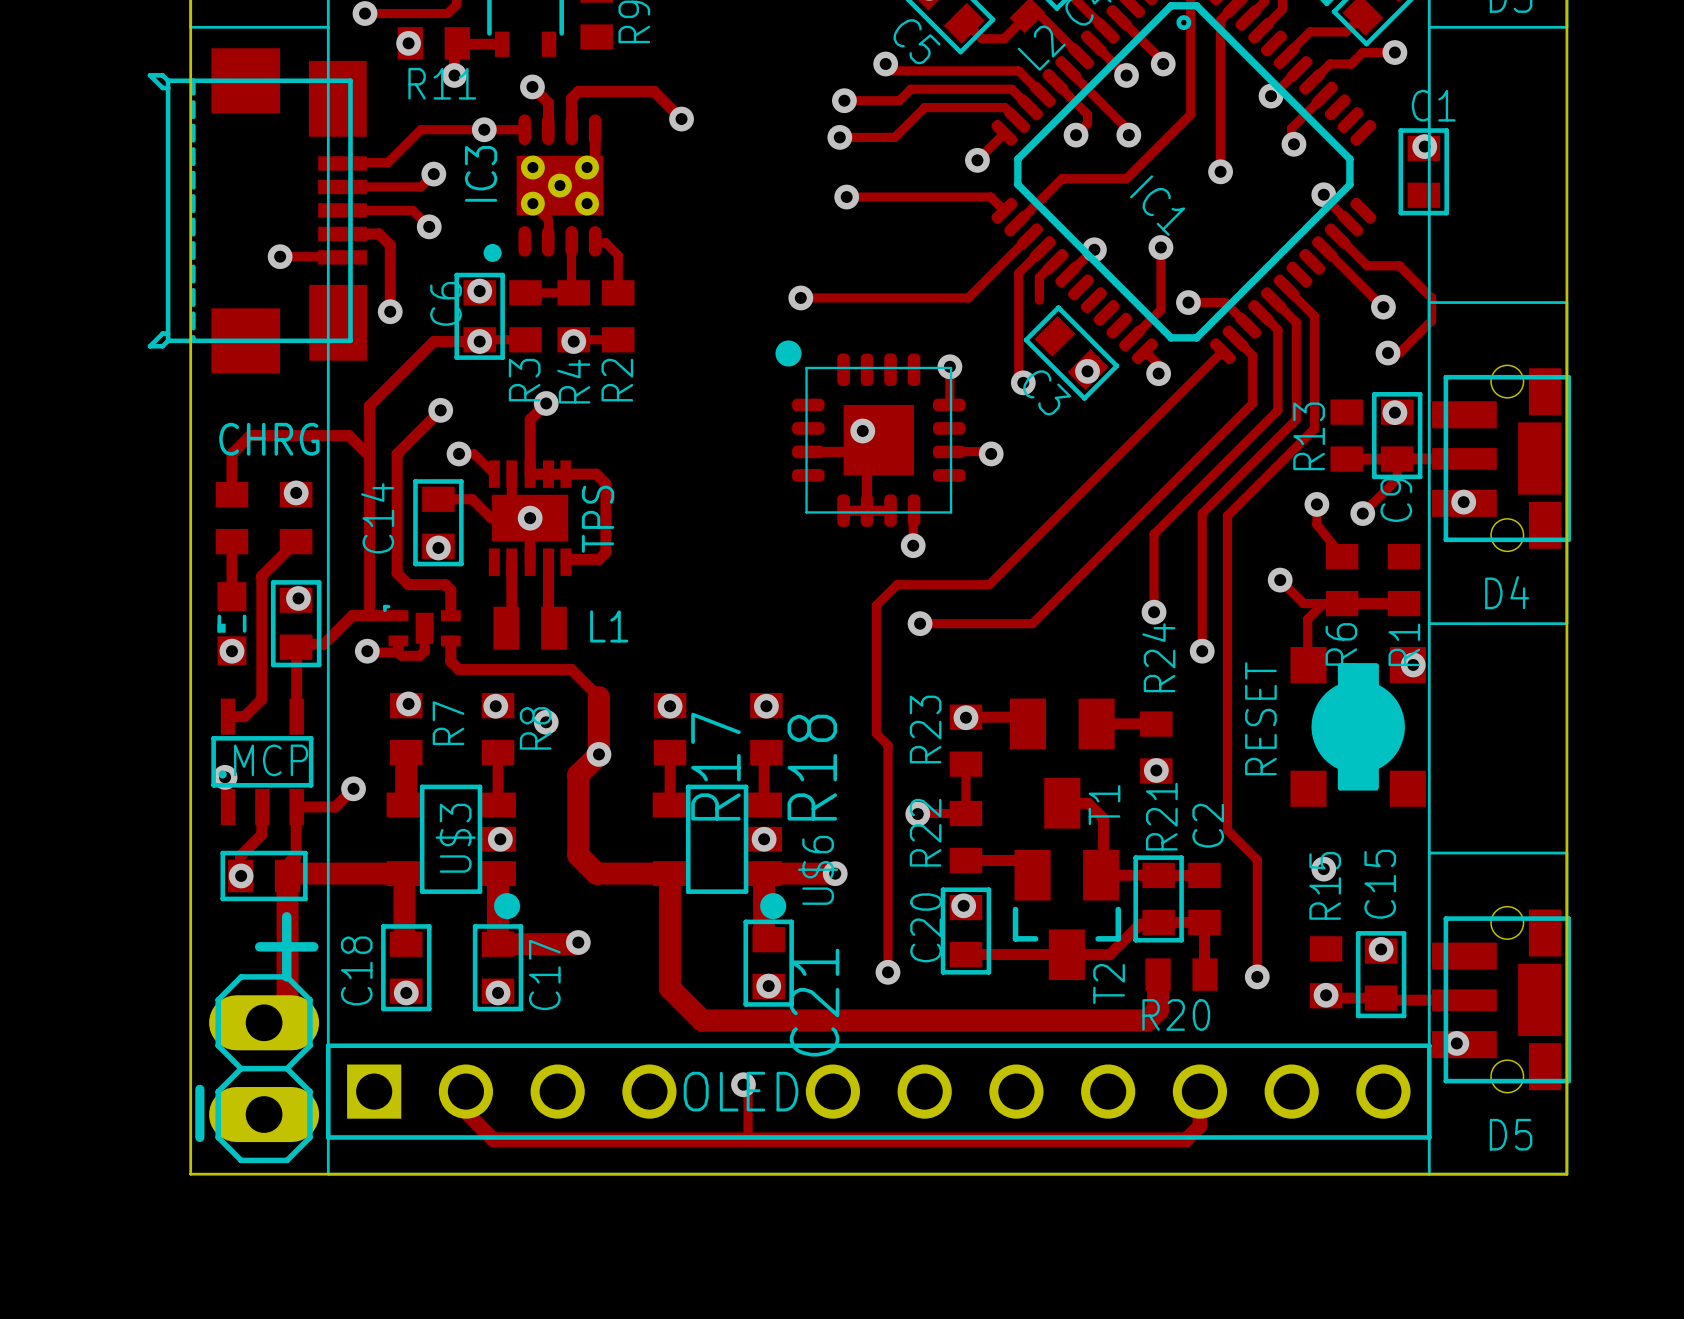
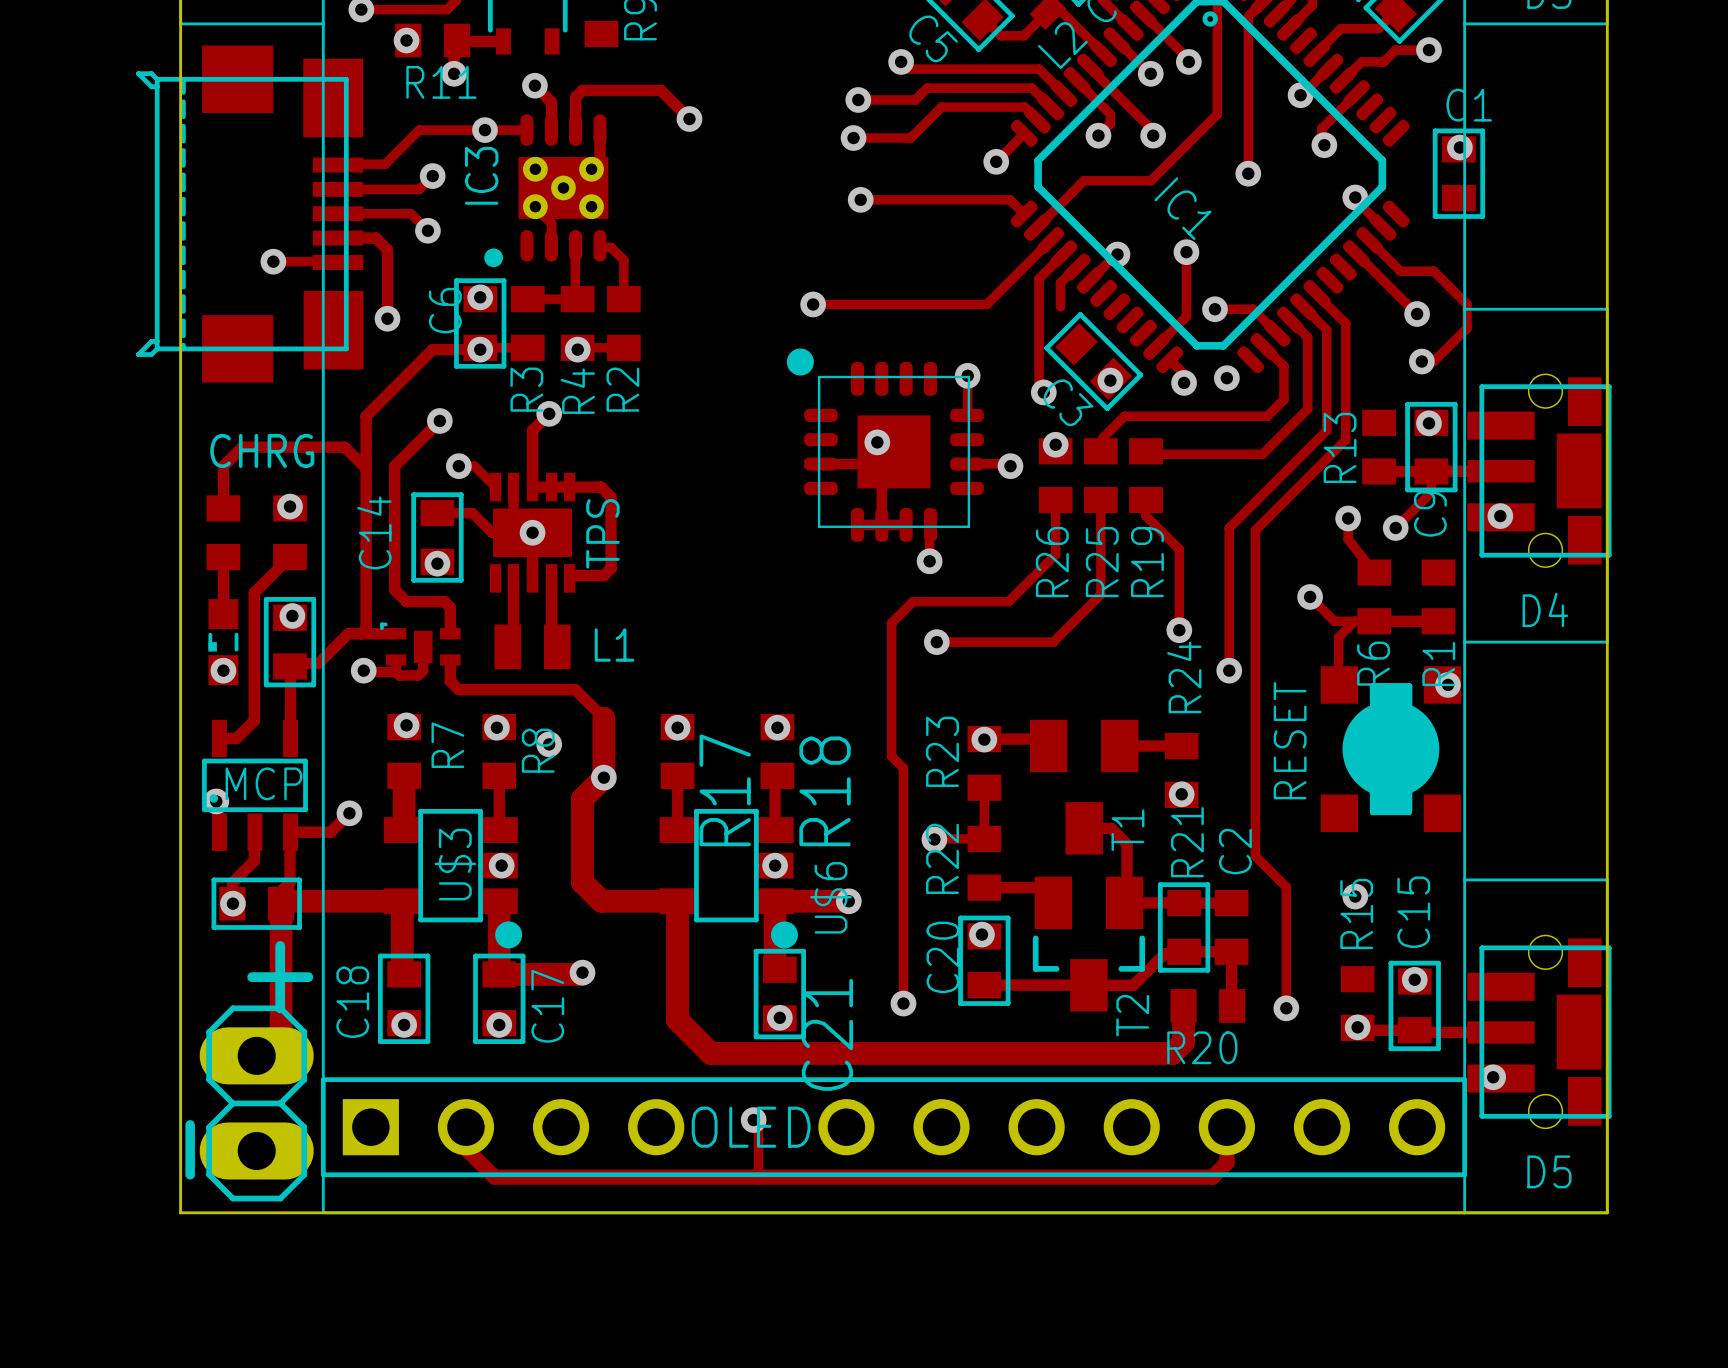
track: (1235, 338) (1252, 355) (1252, 403) (1078, 577) -> (1264, 346) (1283, 366) (1283, 399) (1267, 416) (1124, 416) (1103, 437) (1103, 448) (1100, 451)
track: (1222, 351) (1034, 539) -> (1055, 500) (1055, 554)
via: none -> (1226, 378)
track: (1277, 398) (1277, 410) (1154, 534) -> (1307, 409) (1262, 454) (1148, 454) (1146, 451)
via: none -> (1055, 444)
R26: none -> (1055, 475)
R25: none -> (1100, 475)
R19: none -> (1146, 475)
track: none -> (1100, 500) (1100, 594)
track: none -> (1146, 500) (1146, 516) (1179, 549)

